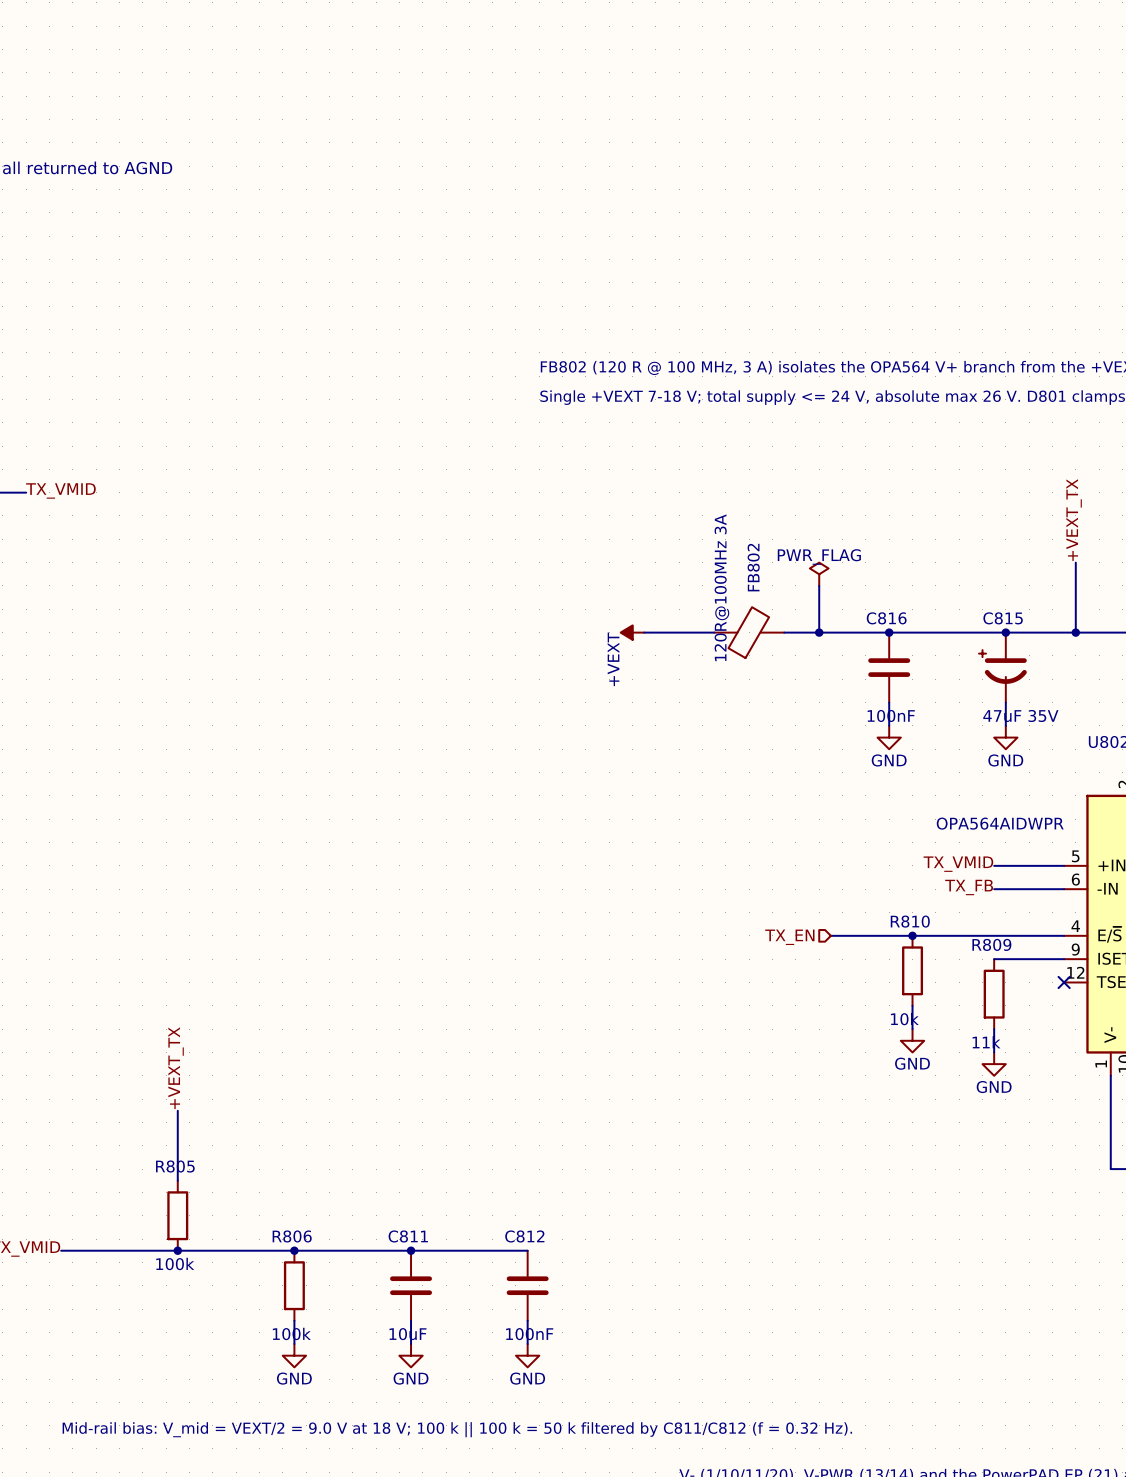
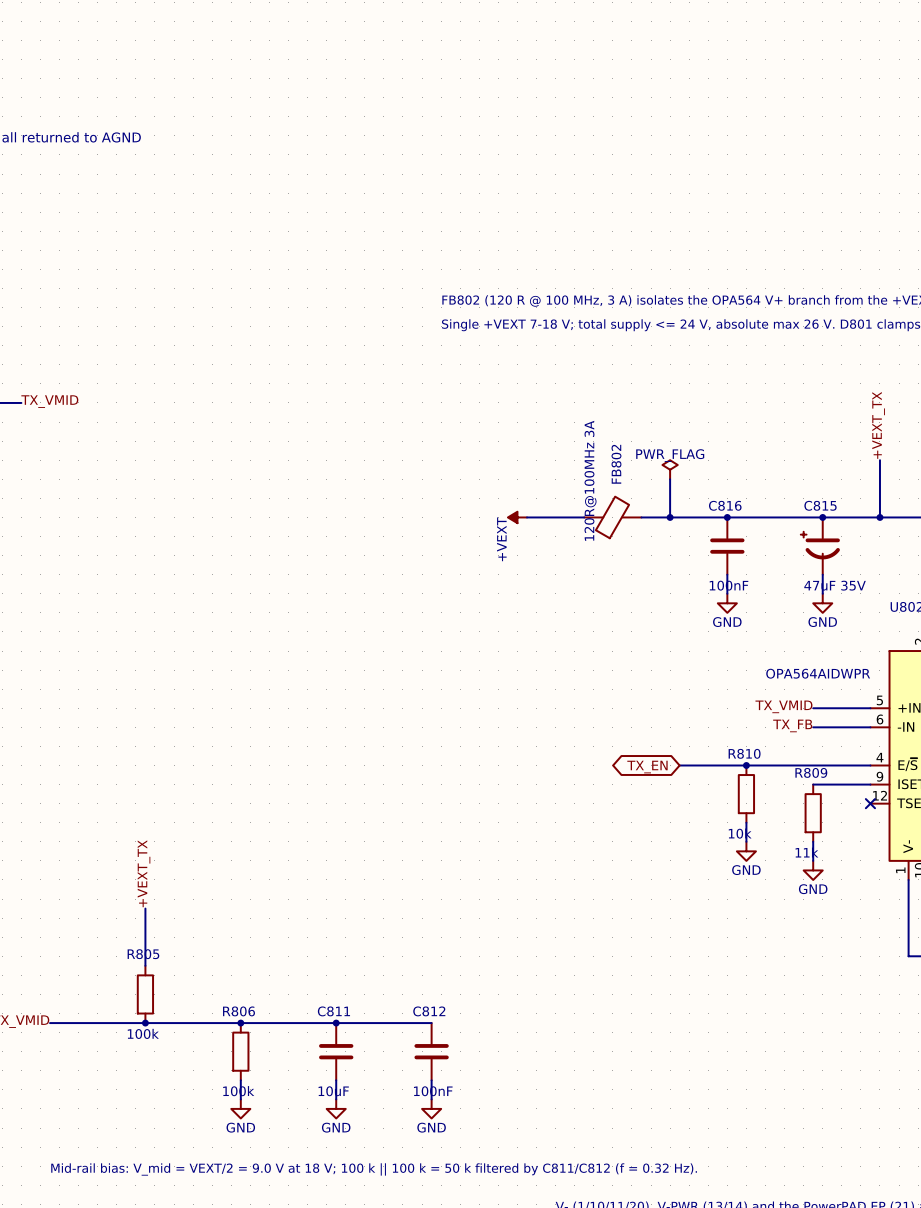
hierarchical label: TX_EN (789, 937) -> none
global label: none -> TX_EN (647, 767)

